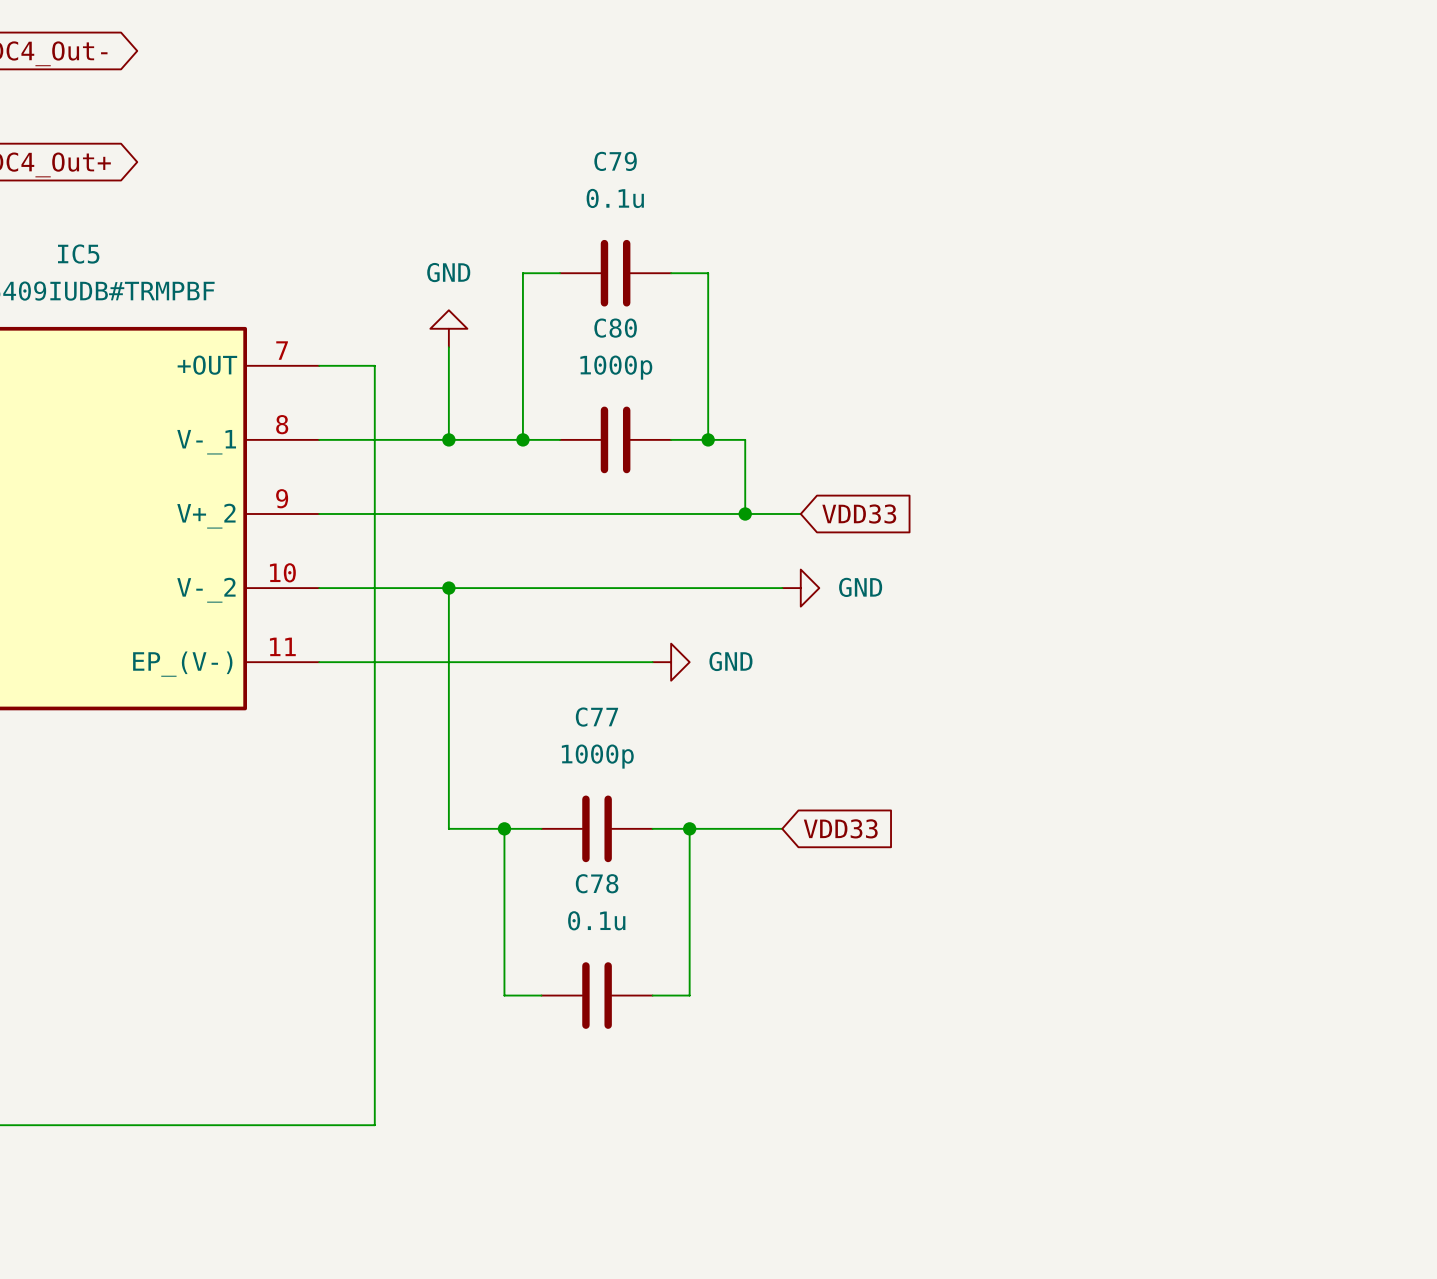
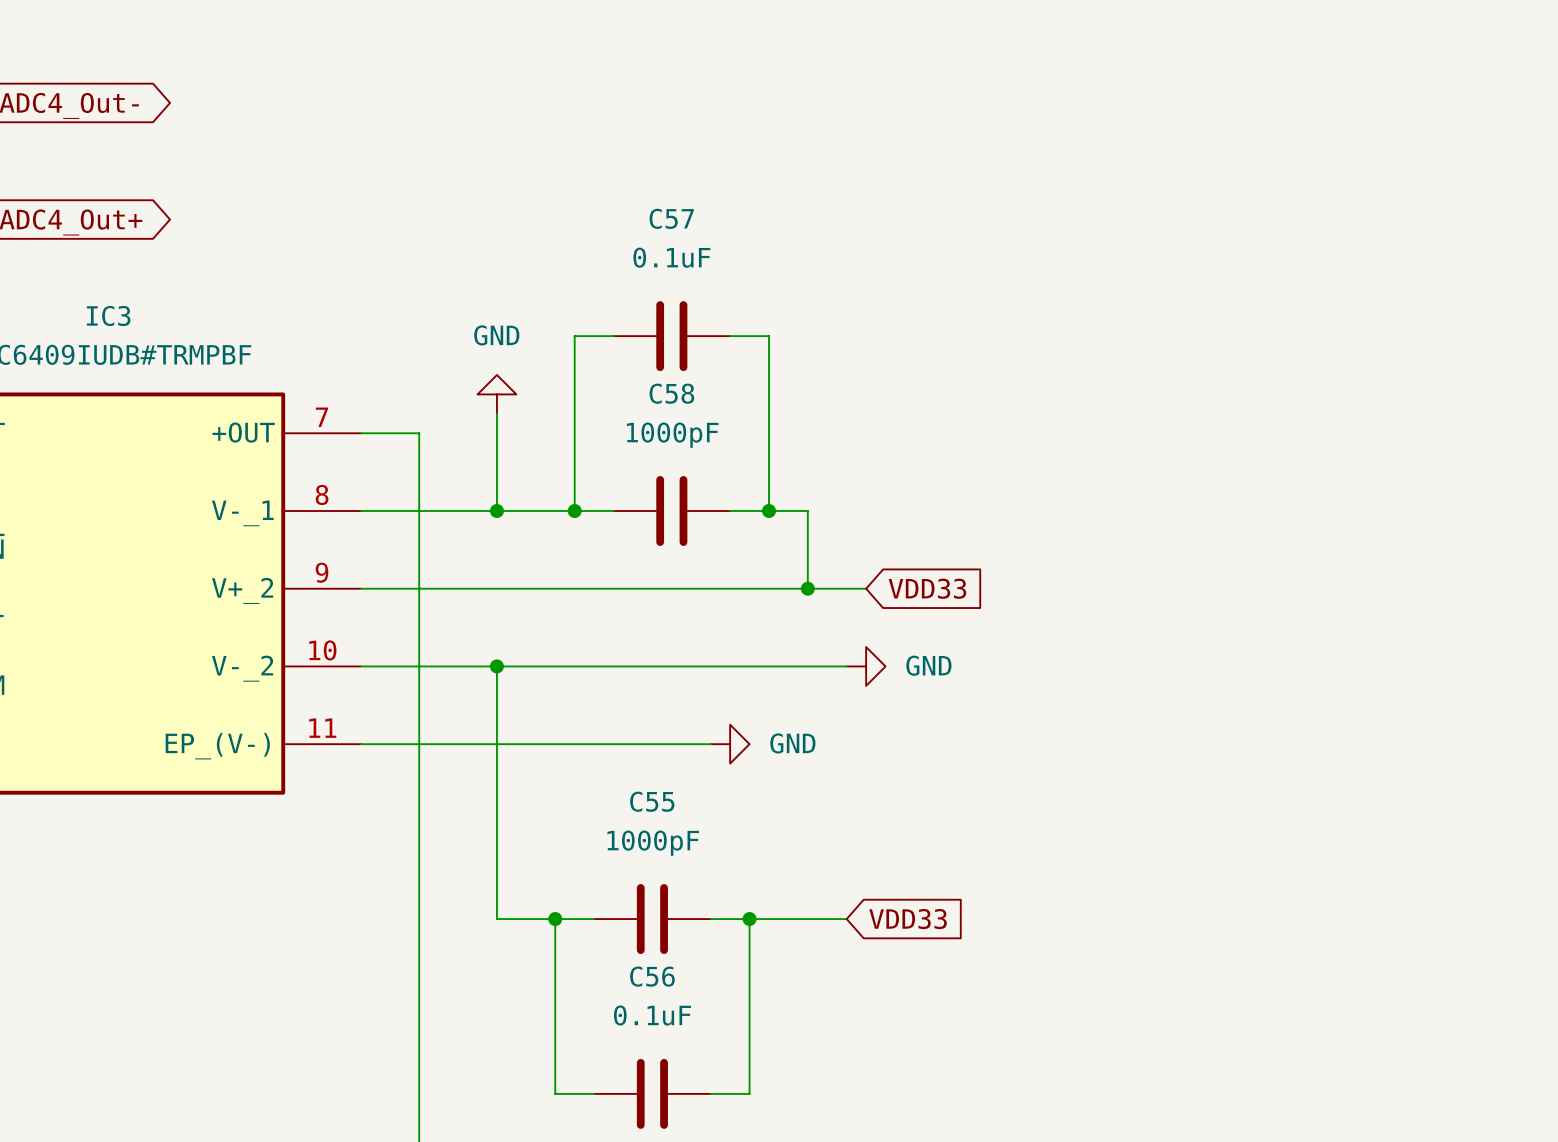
C79 name: C79 (615, 161) -> C57 (671, 218)
C79 value: 0.1u (615, 198) -> 0.1uF (671, 257)
IC5 name: IC5 (78, 254) -> IC3 (108, 315)
C80 name: C80 (615, 328) -> C58 (671, 393)
C80 value: 1000p (616, 367) -> 1000pF (672, 435)
C77 name: C77 (596, 717) -> C55 (652, 801)
C77 value: 1000p (597, 756) -> 1000pF (653, 843)
C78 name: C78 (597, 883) -> C56 (652, 976)
C78 value: 0.1u (596, 920) -> 0.1uF (652, 1015)

